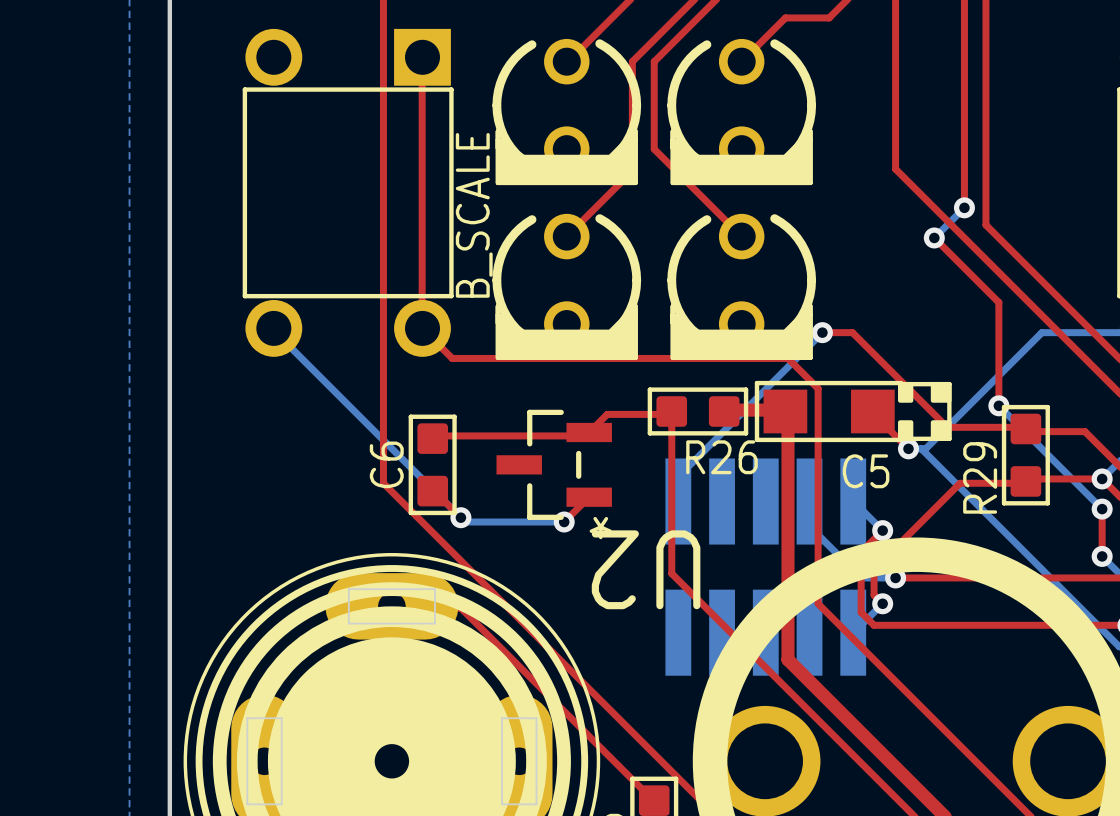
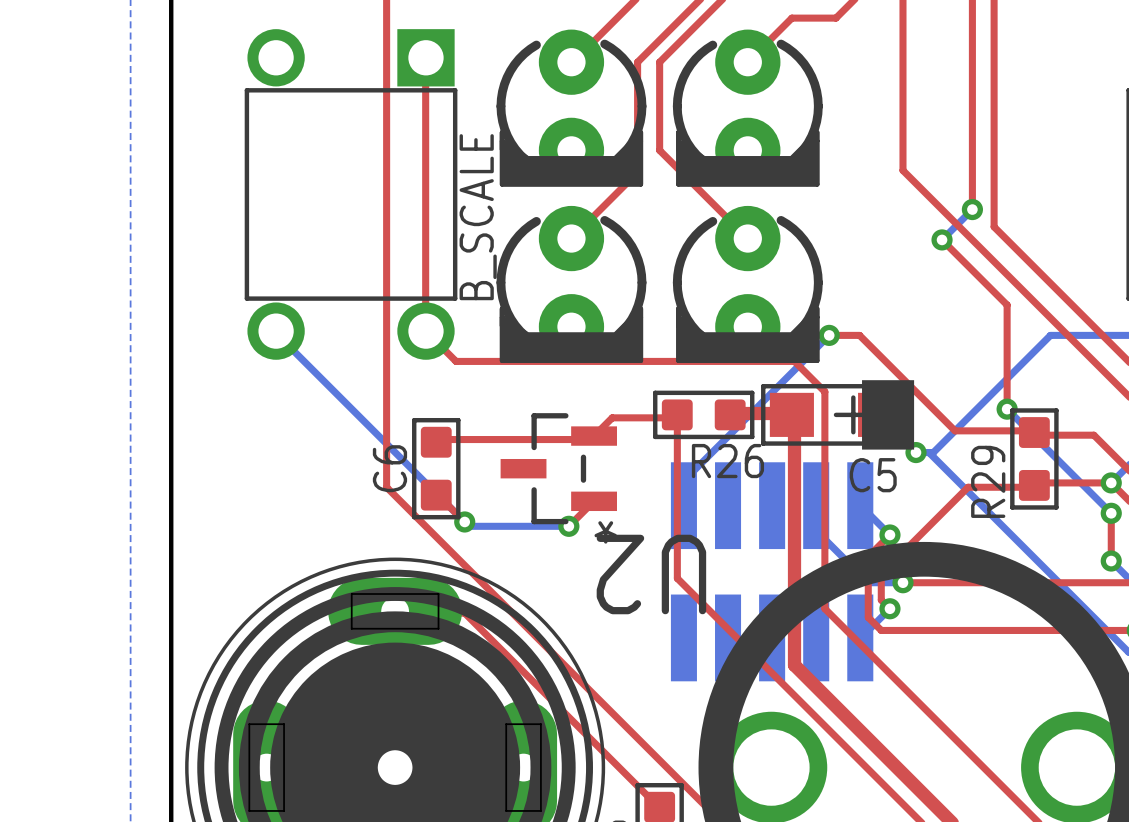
part footprint: [492, 38, 642, 186] -> [496, 29, 647, 187]
part footprint: [667, 38, 817, 186] -> [672, 29, 823, 187]
part footprint: [492, 213, 642, 360] -> [496, 205, 647, 363]
part footprint: [667, 213, 817, 360] -> [672, 205, 823, 363]
C5 footprint: [754, 380, 952, 443] -> [761, 380, 915, 450]

